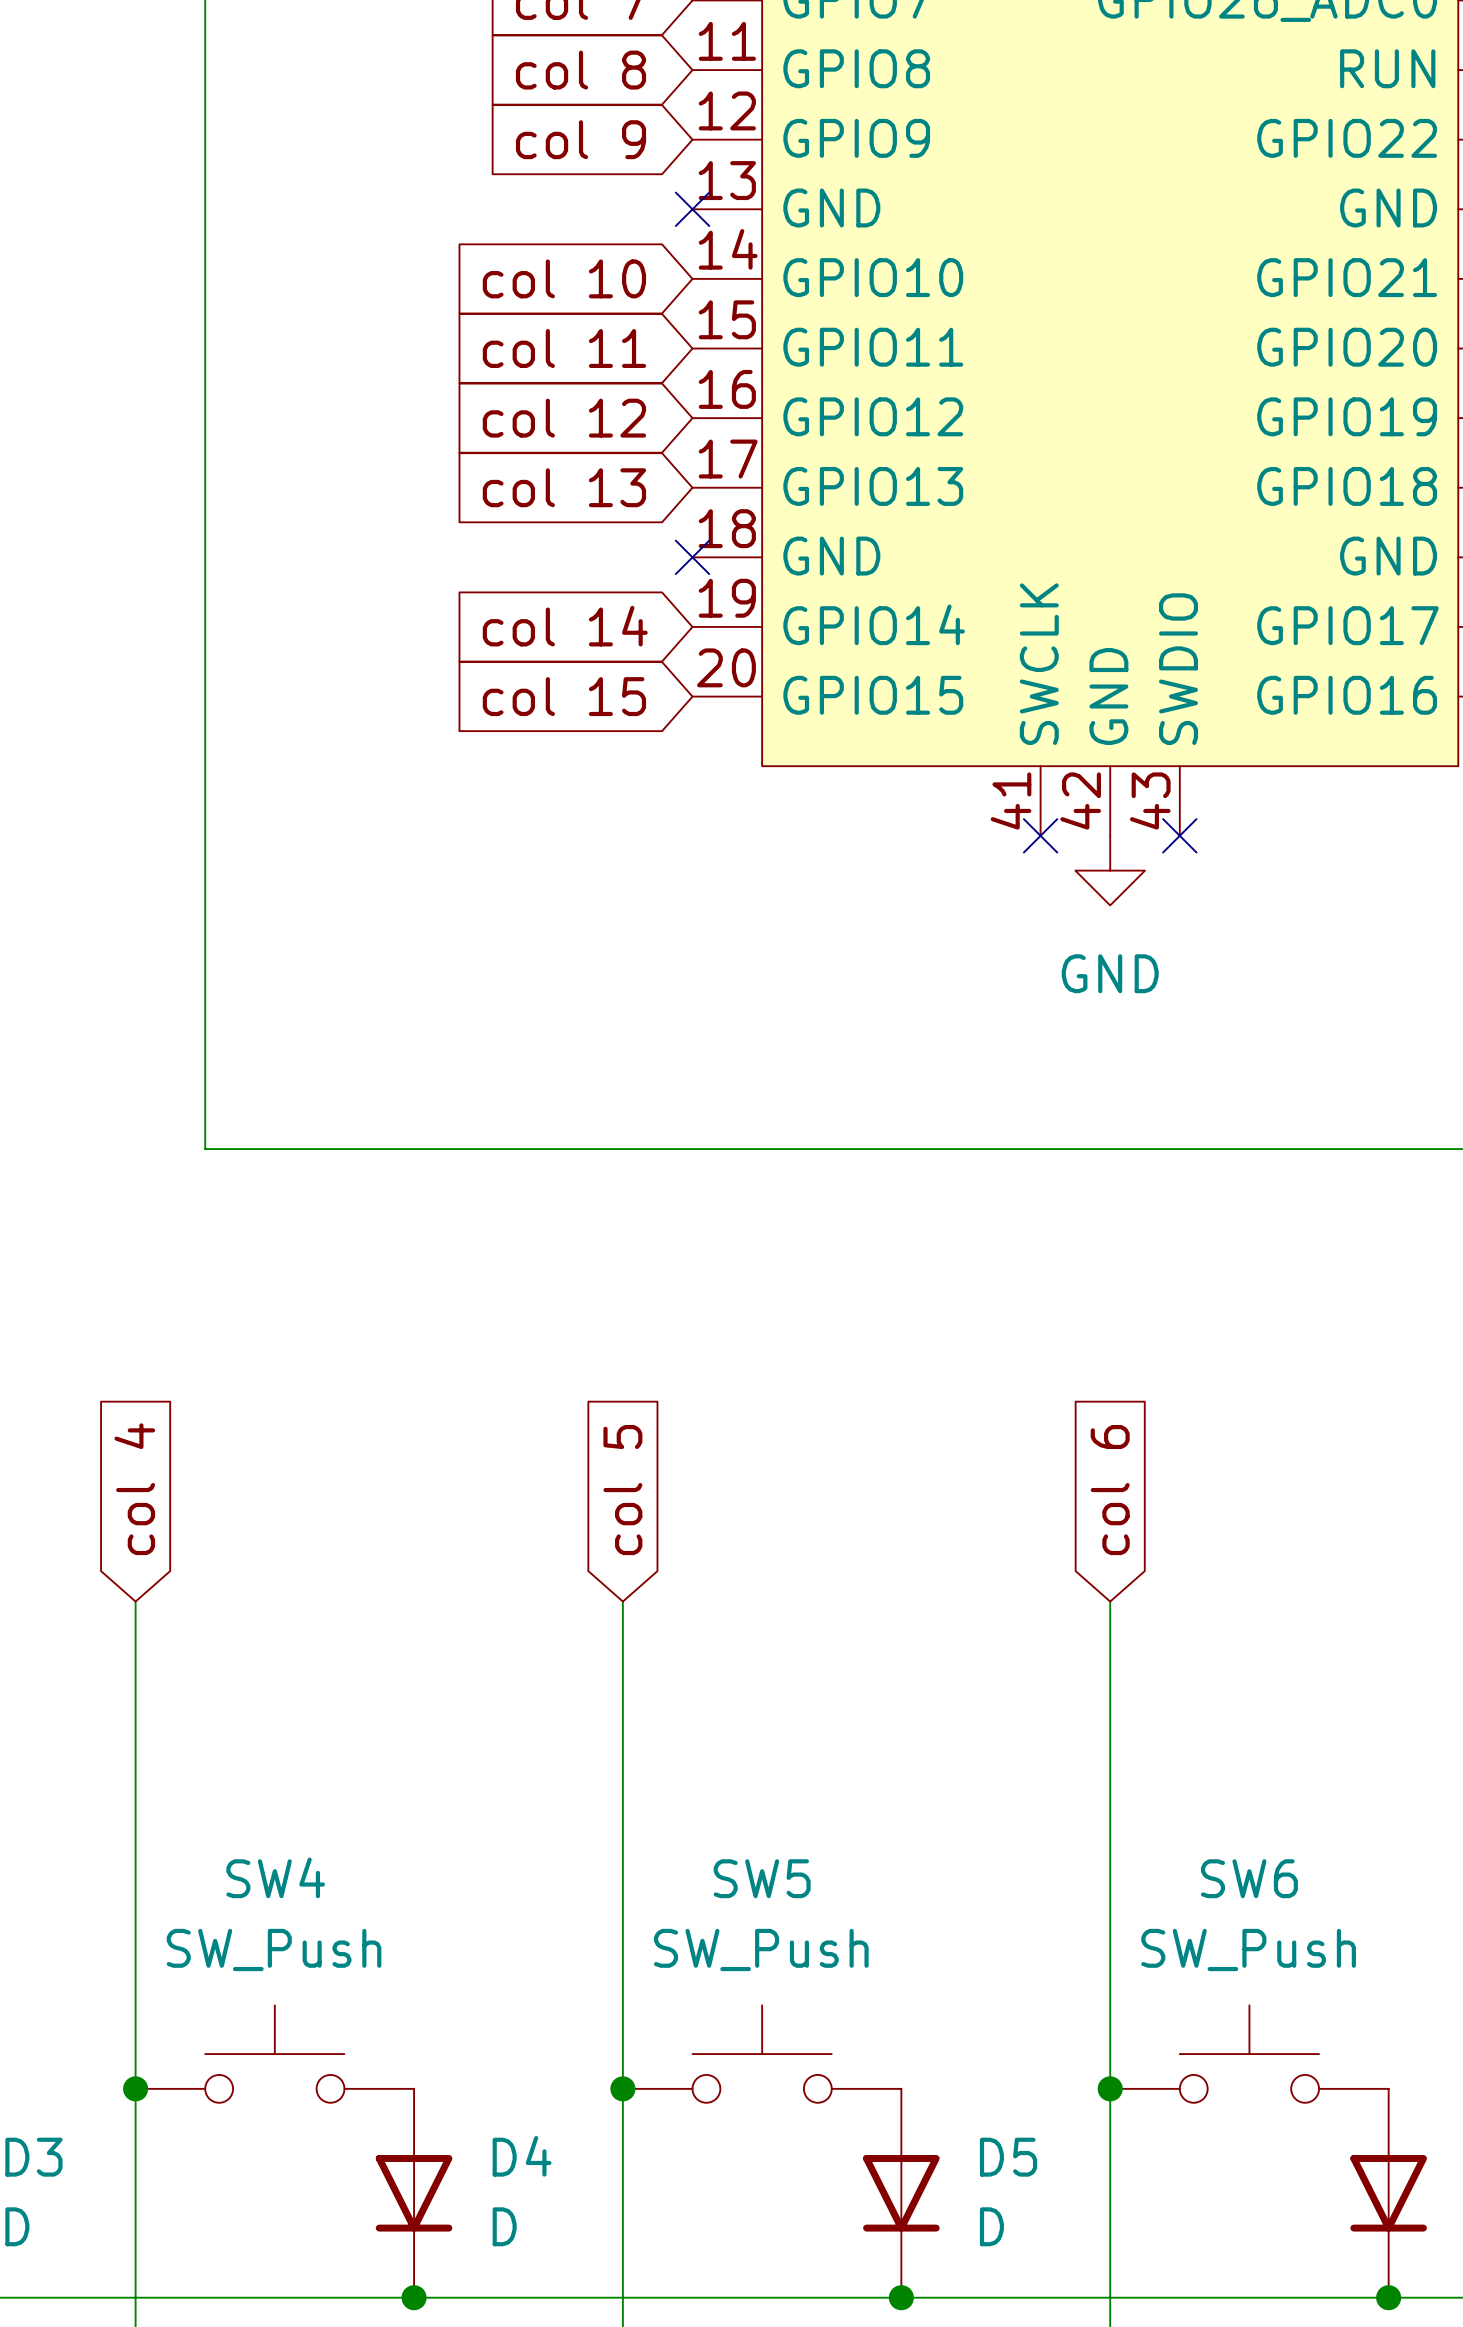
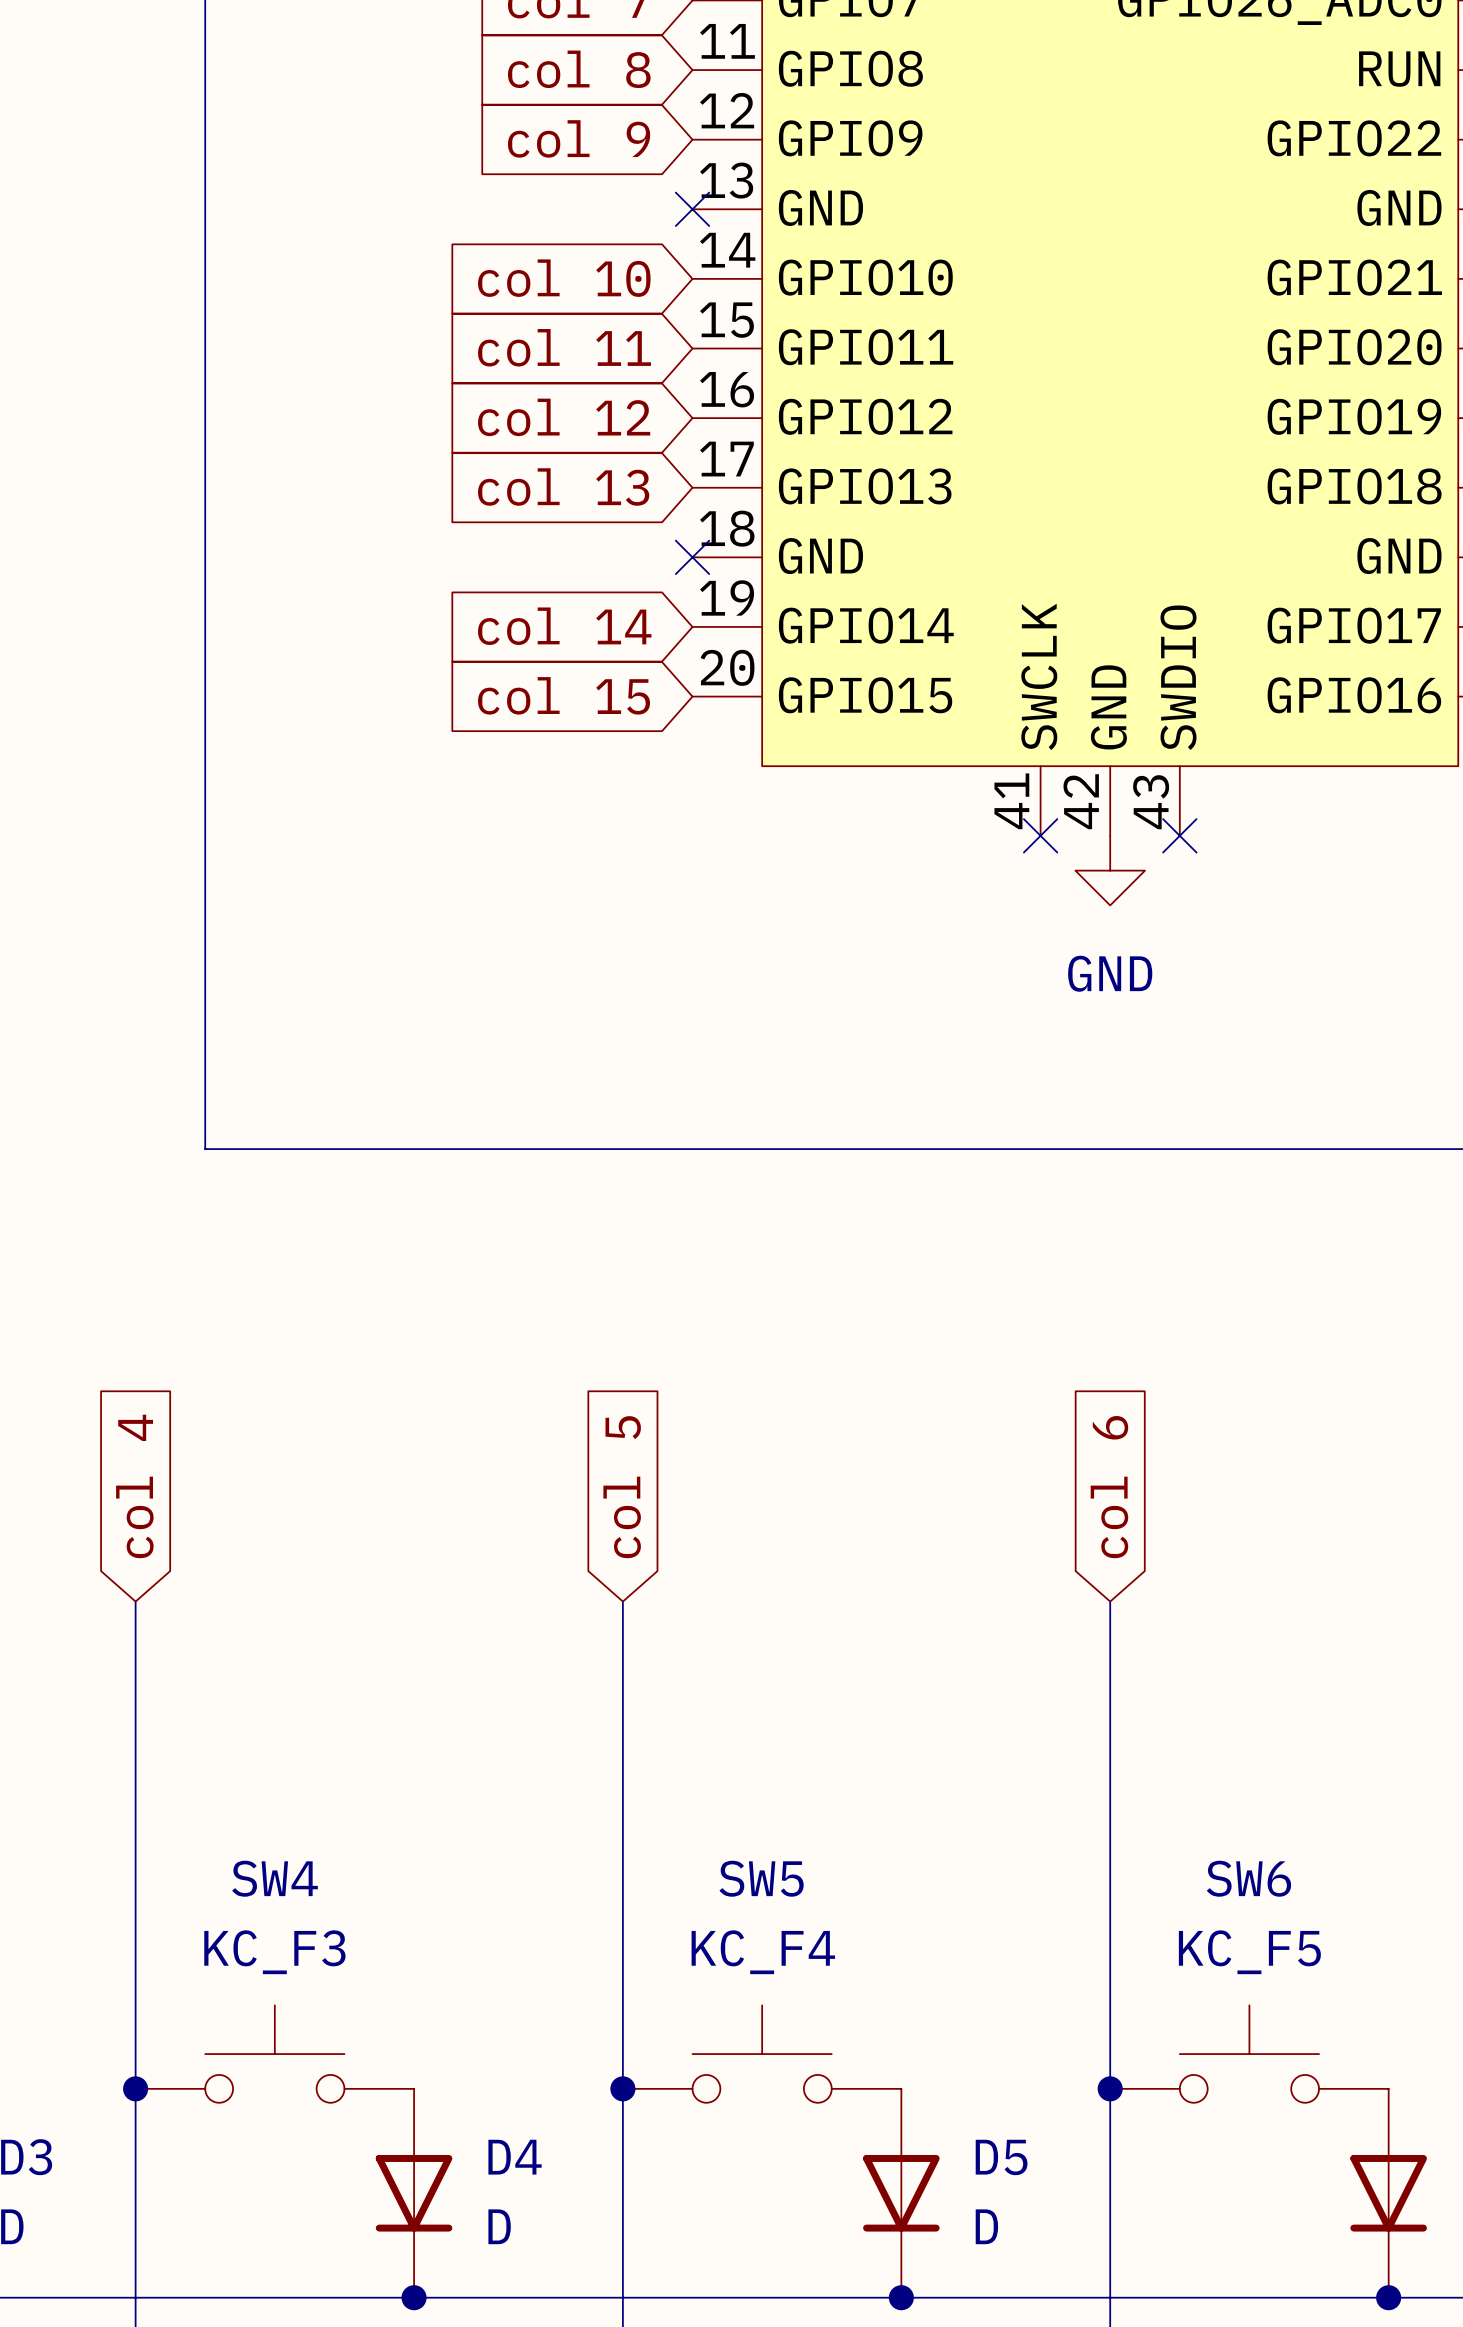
SW4 value: SW_Push (274, 1949) -> KC_F3 (274, 1952)
SW5 value: SW_Push (761, 1949) -> KC_F4 (763, 1952)
SW6 value: SW_Push (1248, 1949) -> KC_F5 (1249, 1952)

